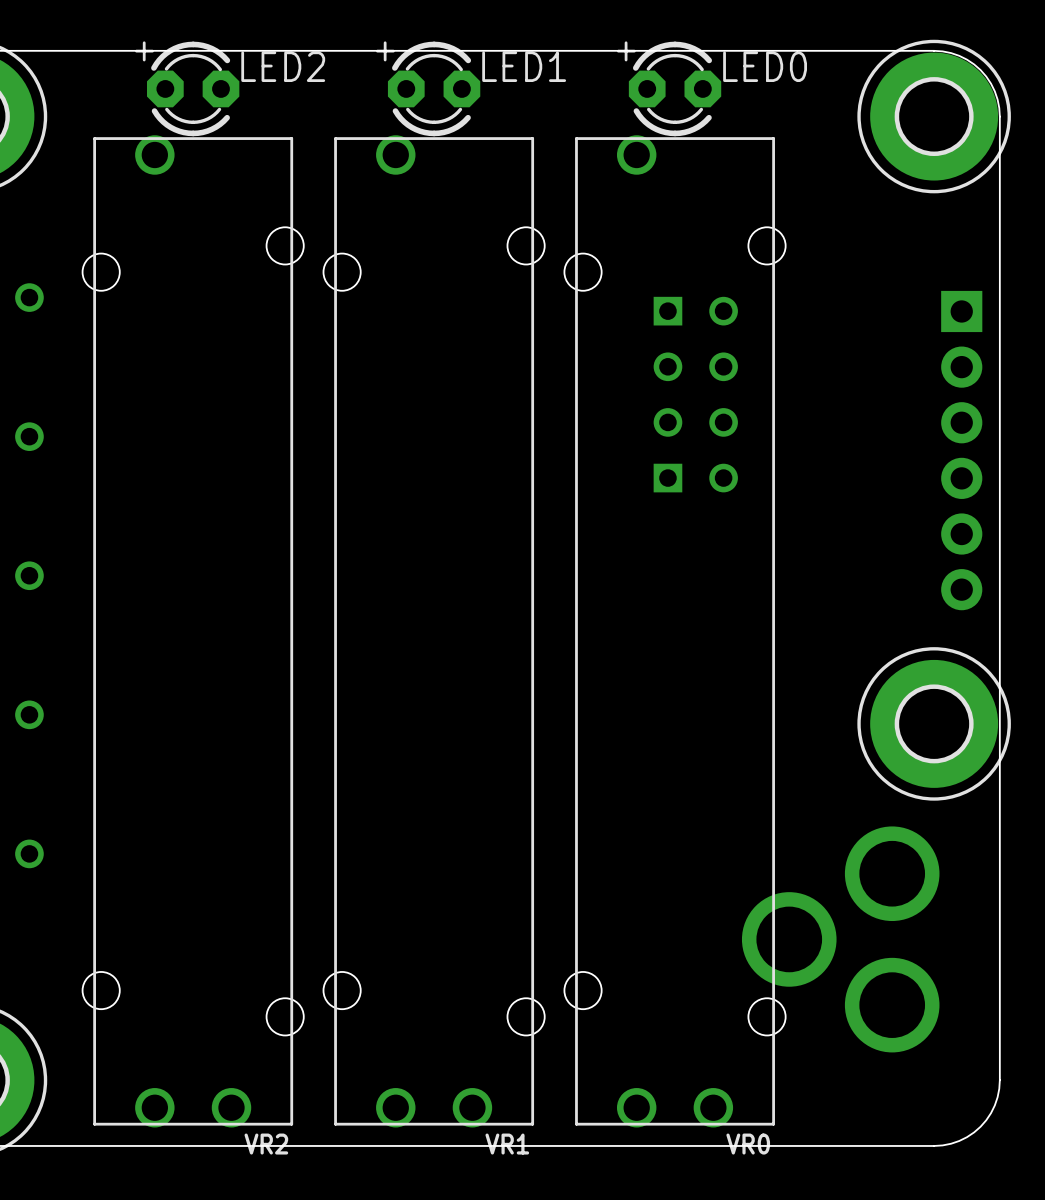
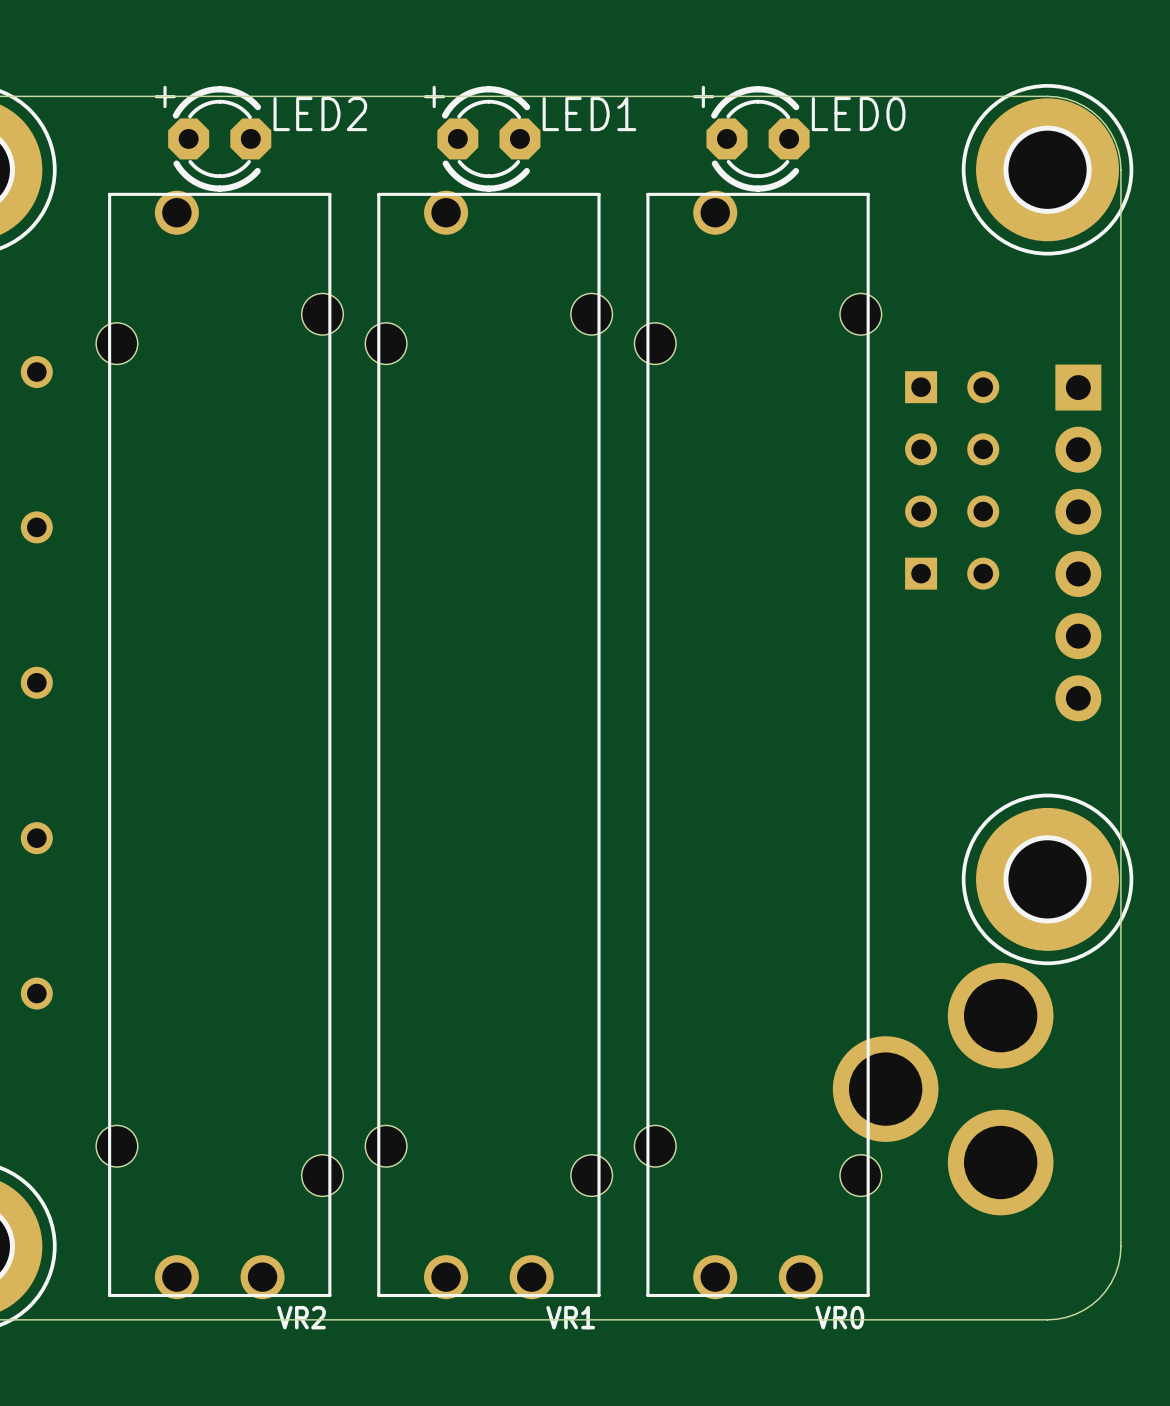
part position: (695, 394) -> (952, 480)
part position: (934, 723) -> (1047, 879)

